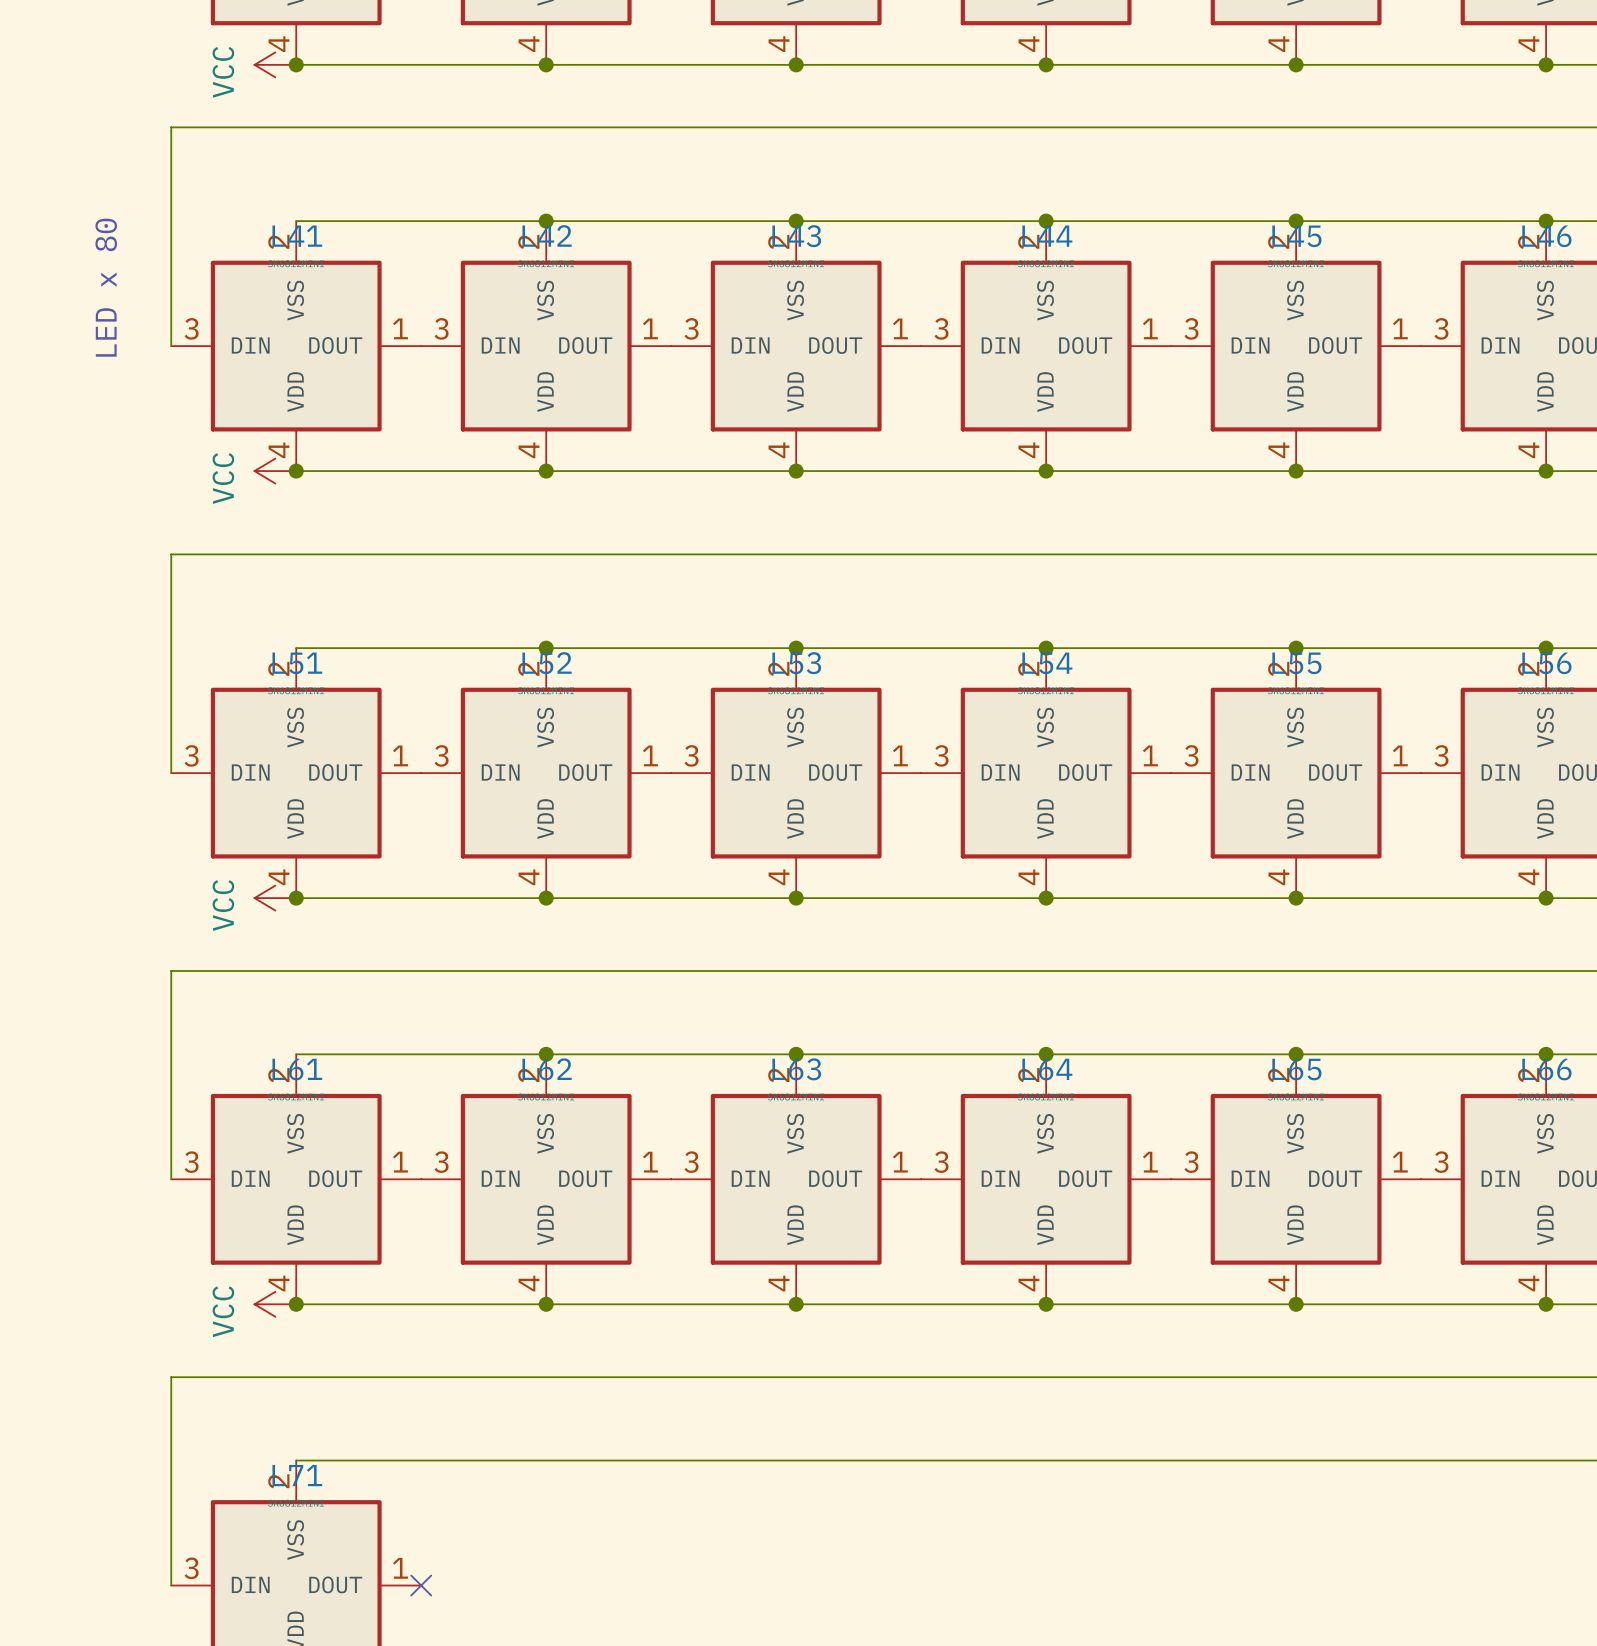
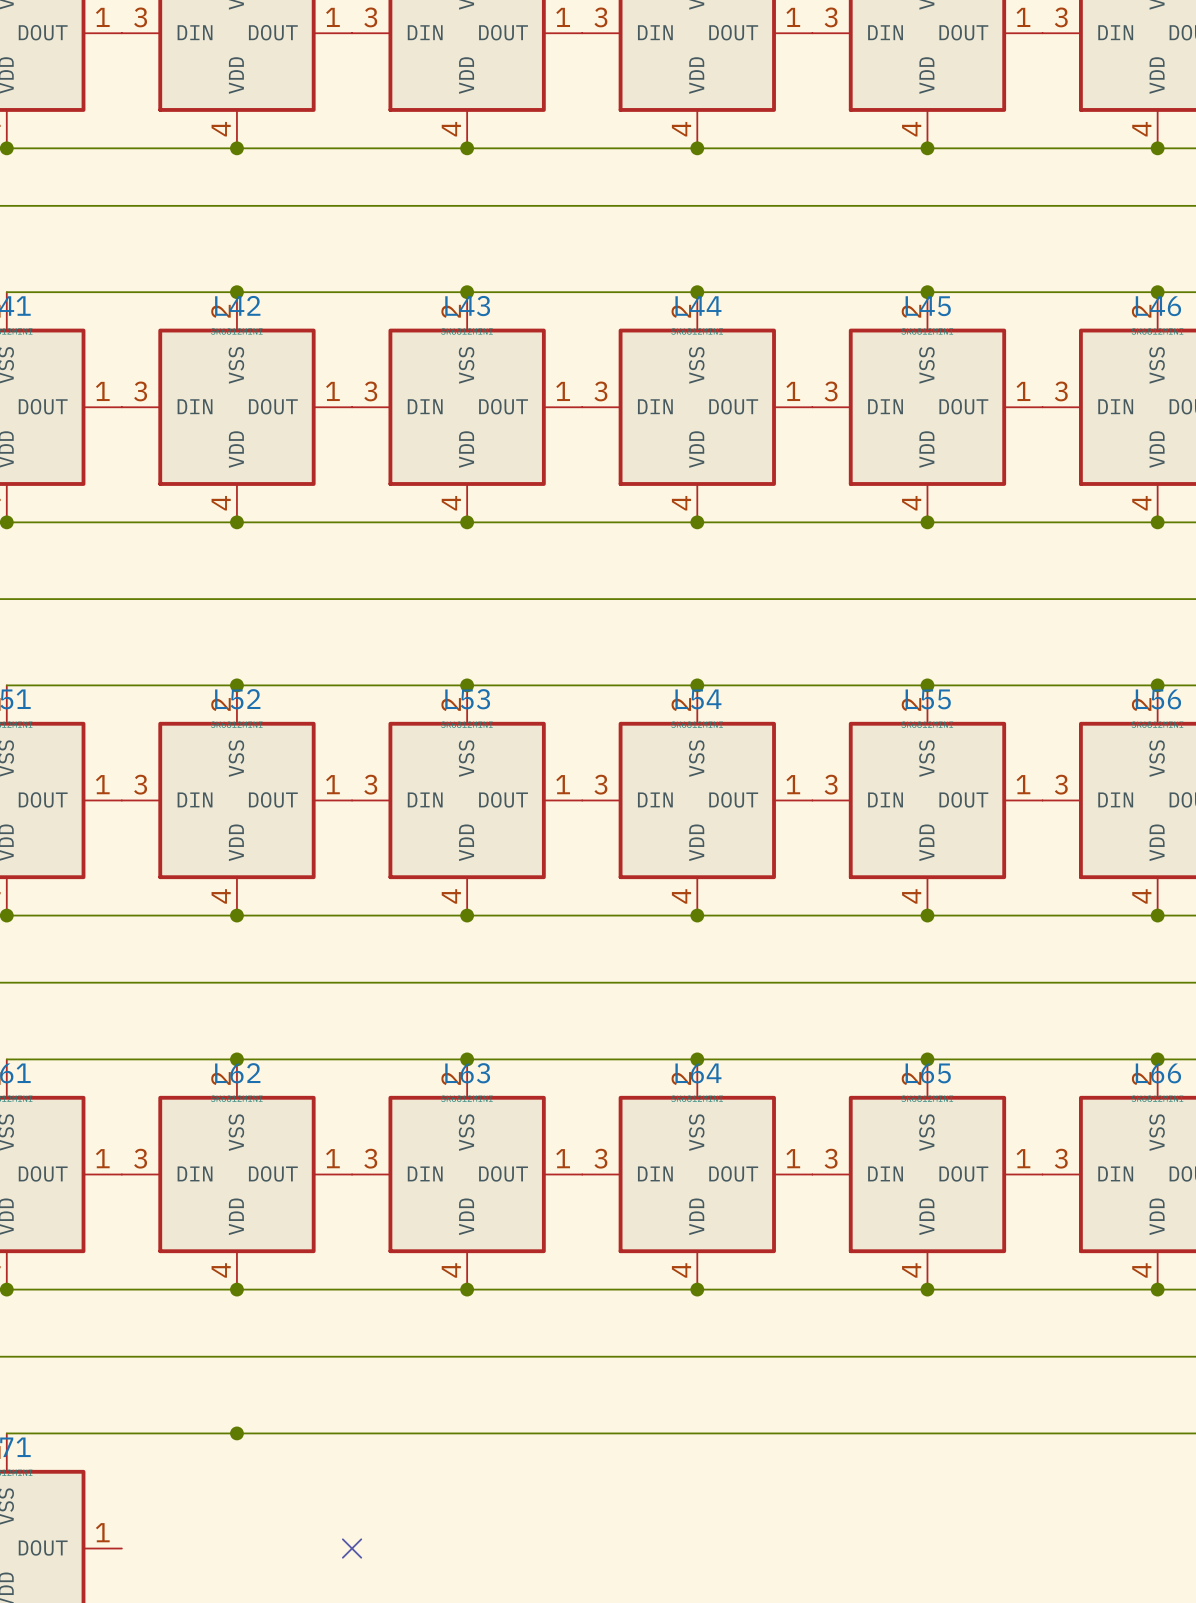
junction: none -> (236, 1433)
no-connect mark: (421, 1585) -> none
no-connect mark: none -> (352, 1548)

